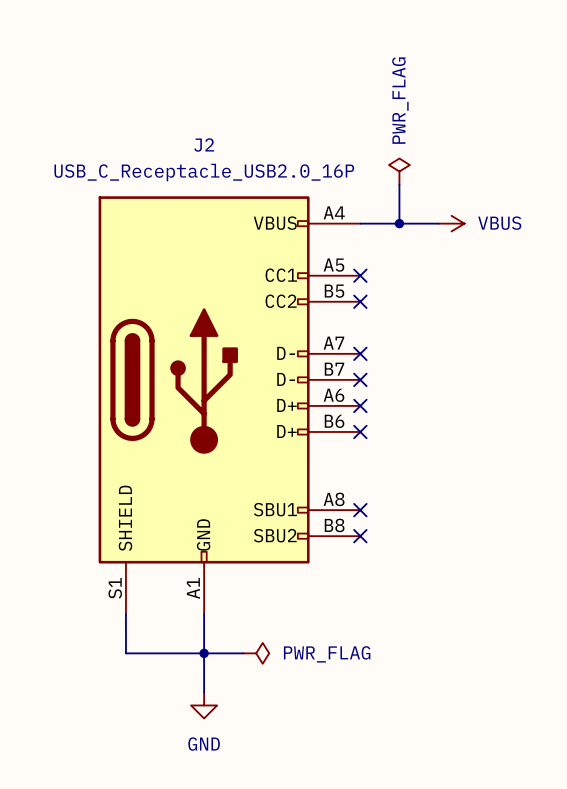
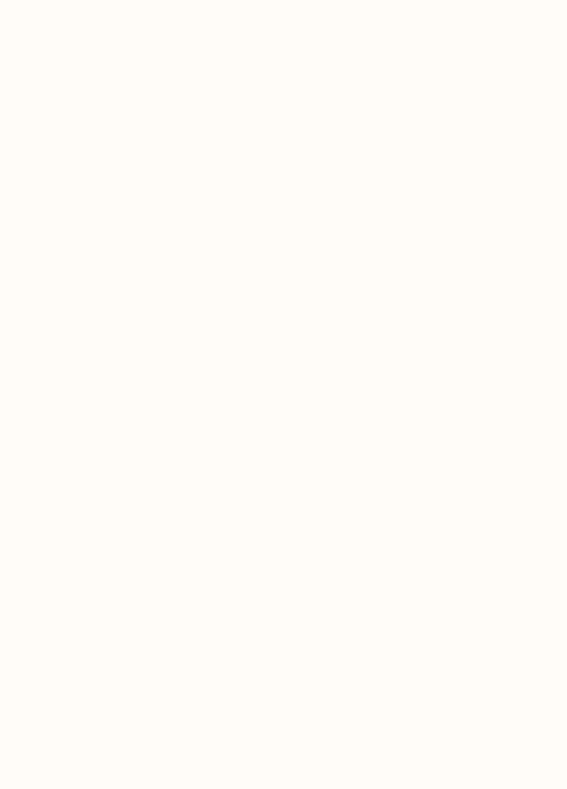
power symbol: PWR_FLAG (399, 171) -> none
wire: (399, 184) (399, 223) -> none
wire: (360, 223) (438, 223) -> none
junction: (399, 223) -> none
power symbol: VBUS (451, 223) -> none
no-connect mark: (360, 275) -> none
no-connect mark: (360, 301) -> none
no-connect mark: (360, 353) -> none
no-connect mark: (360, 379) -> none
J2: USB_C_Receptacle_USB2.0_16P (229, 405) -> none
no-connect mark: (360, 405) -> none
no-connect mark: (360, 431) -> none
no-connect mark: (360, 510) -> none
no-connect mark: (360, 536) -> none
wire: (125, 614) (125, 653) (243, 653) -> none
wire: (204, 614) (204, 692) -> none
junction: (204, 653) -> none
power symbol: PWR_FLAG (256, 653) -> none
power symbol: GND (204, 705) -> none

